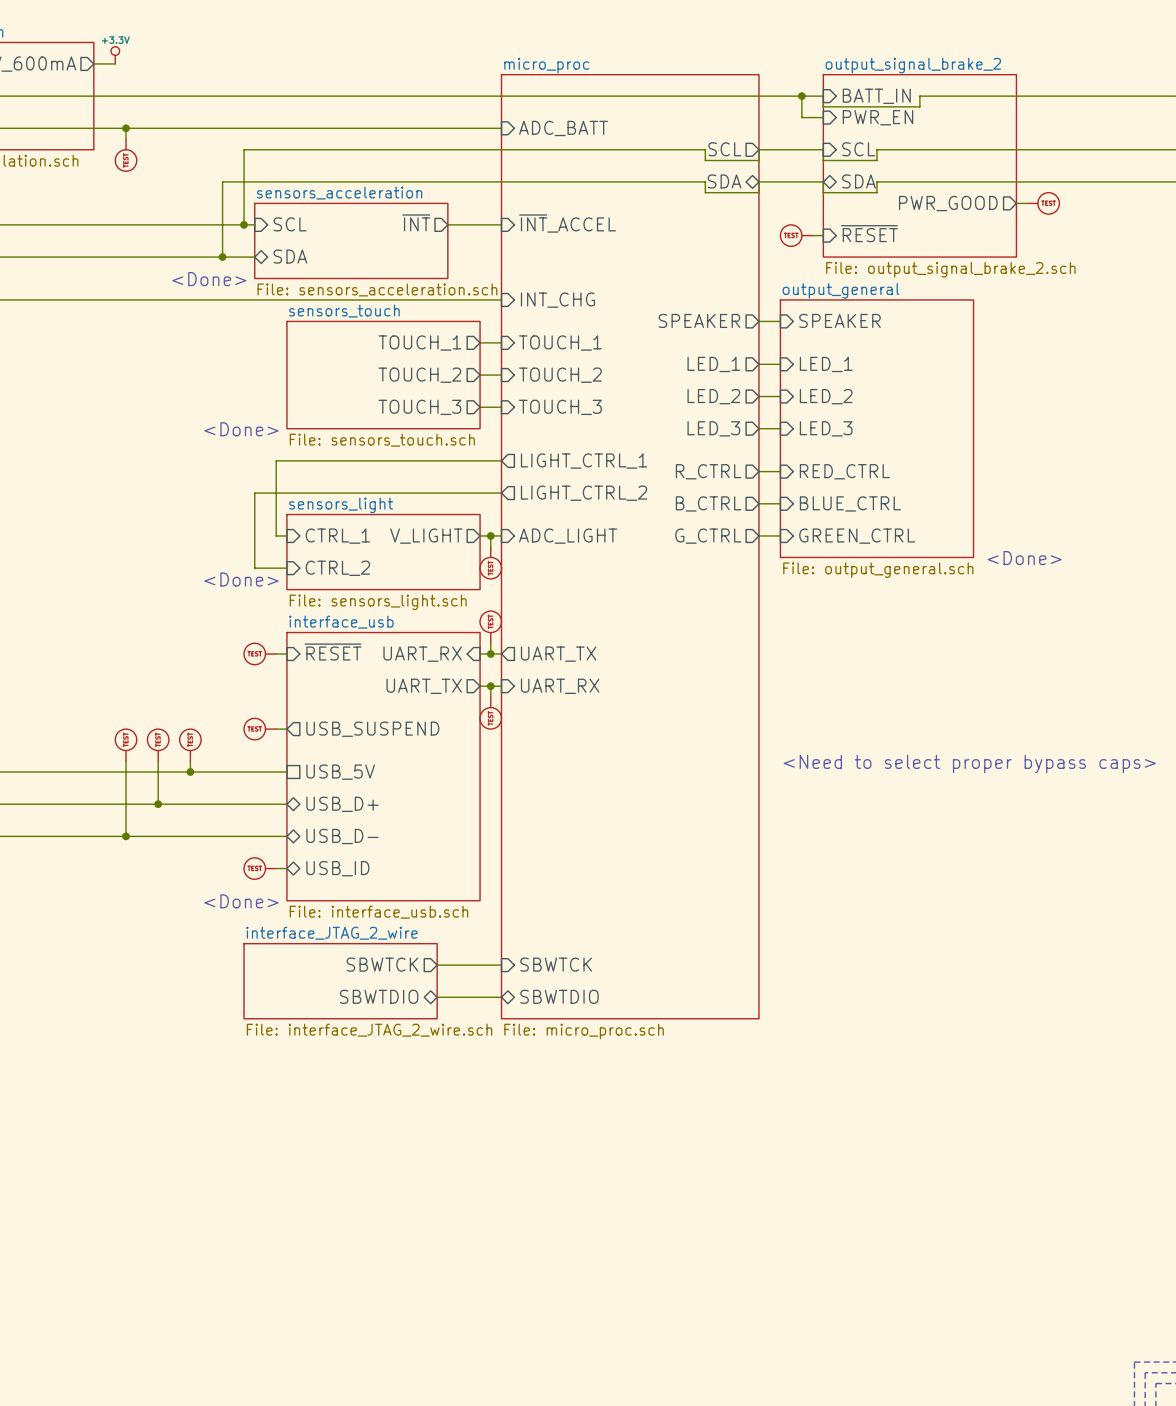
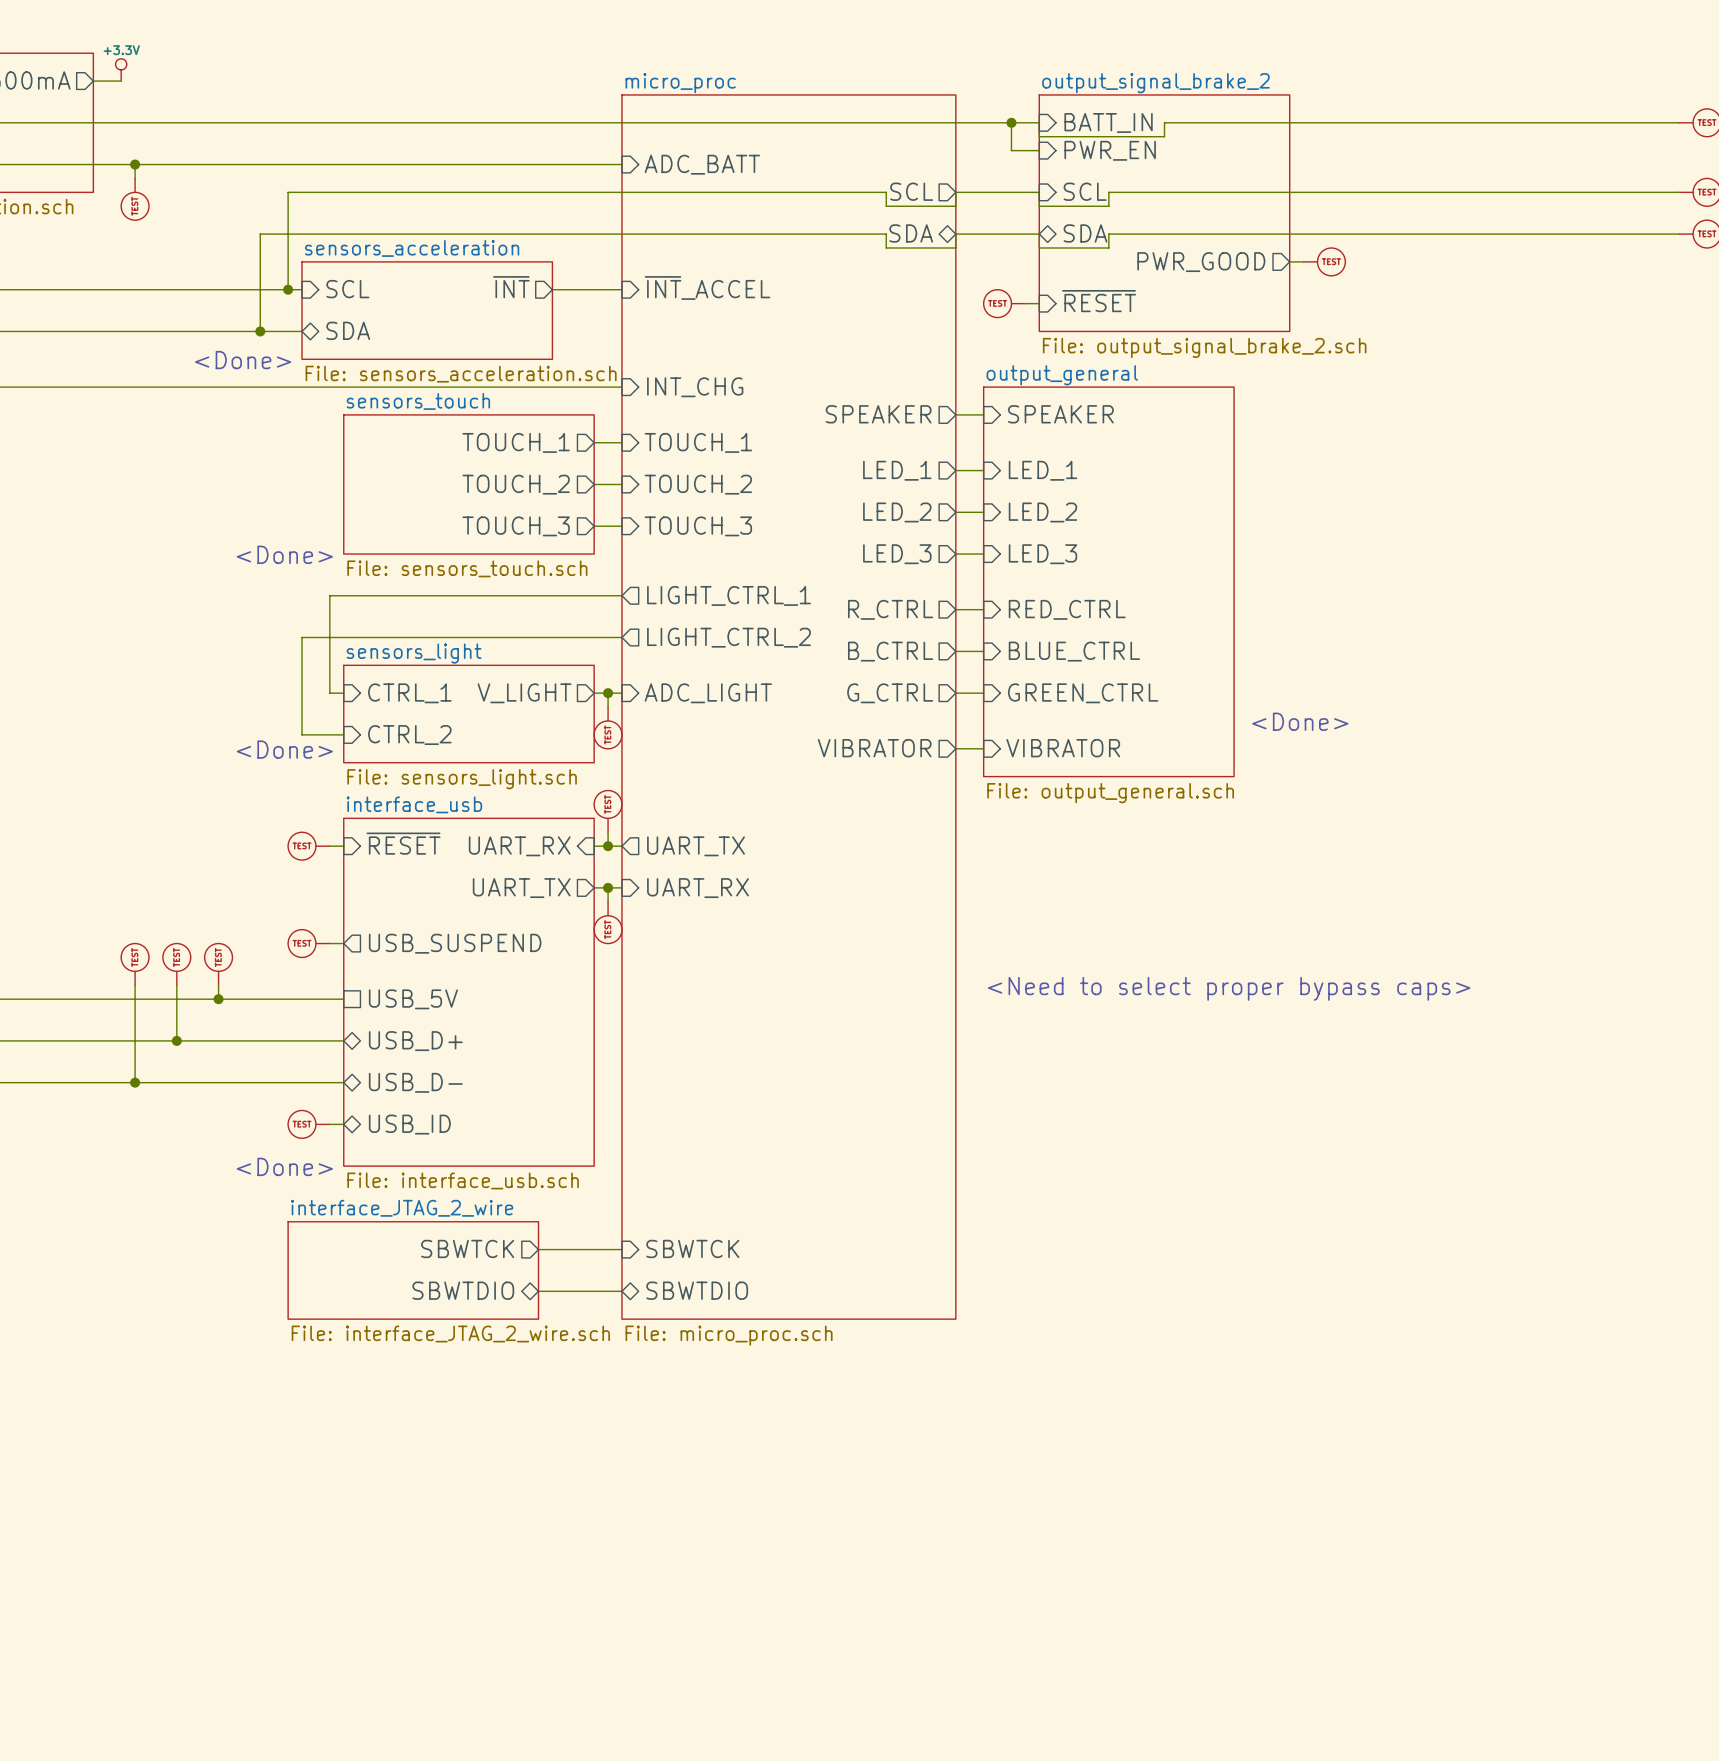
sheet output_general: File: output_general.sch (876, 428) -> none
sheet output_general: none -> File: output_general.sch (1108, 581)
sheet pin: none -> VIBRATOR (874, 748)
wire: none -> (955, 748) (983, 748)
sheet pin: none -> VIBRATOR (1063, 748)

